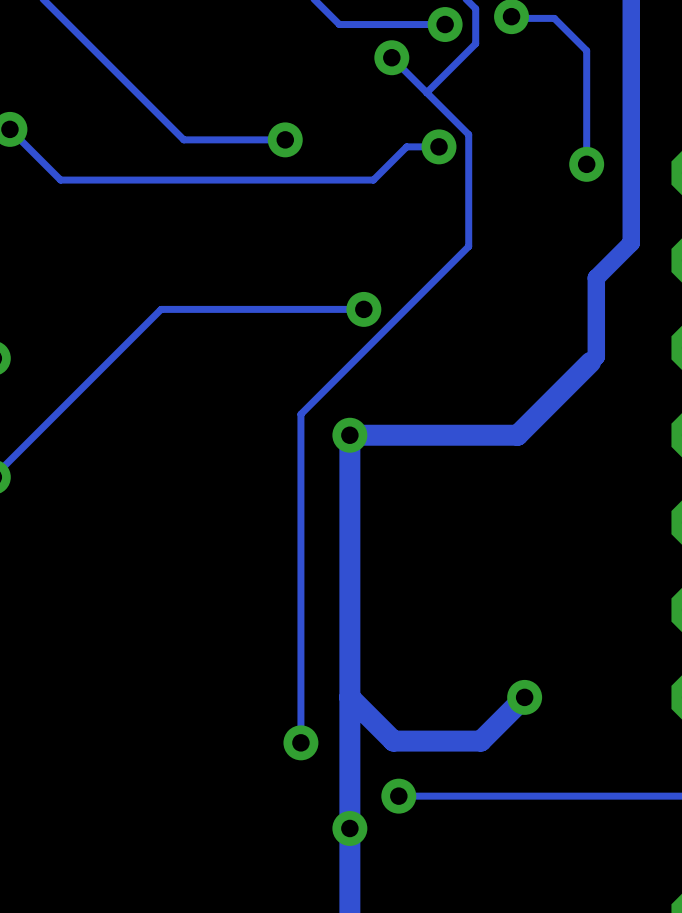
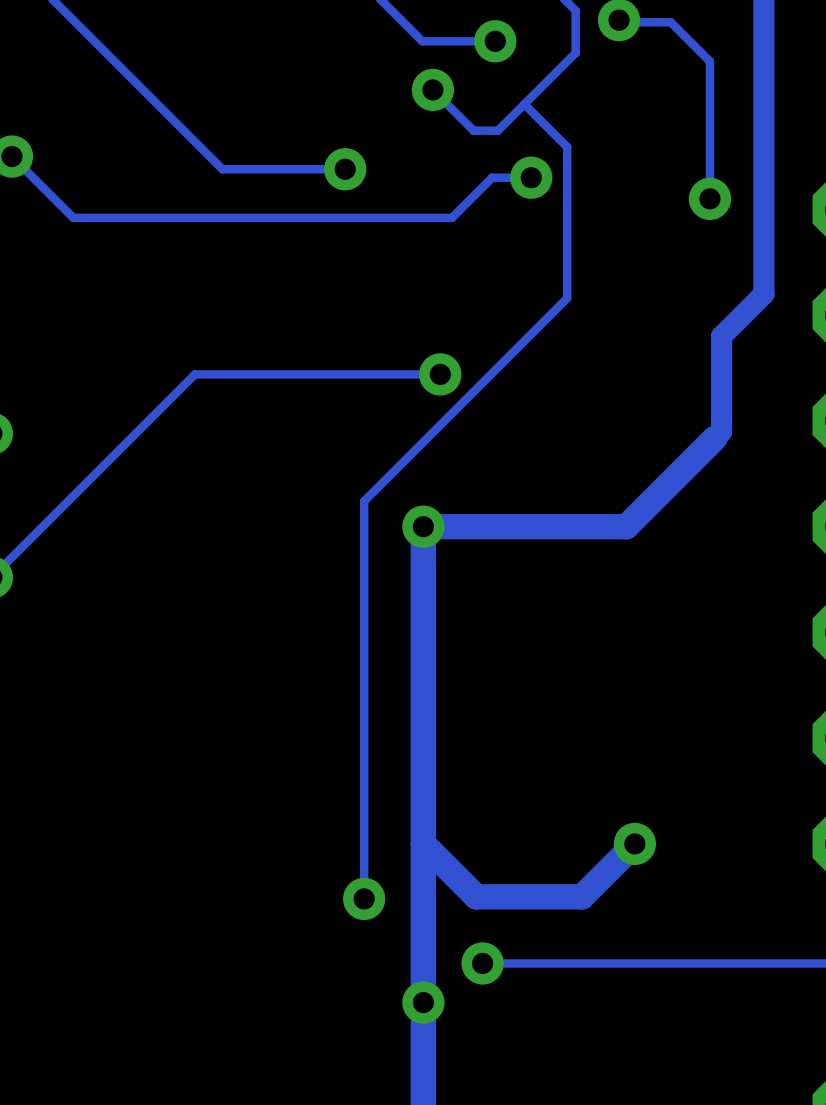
track: (445, 24) (339, 24) -> (495, 41) (422, 41) (410, 29)
via: (445, 24) -> none
via: none -> (495, 41)
track: (391, 57) (468, 134) -> (524, 104) (567, 147) (567, 162)
via: (391, 57) -> none
track: none -> (432, 89) (473, 130) (497, 130) (516, 112)
via: none -> (432, 89)

